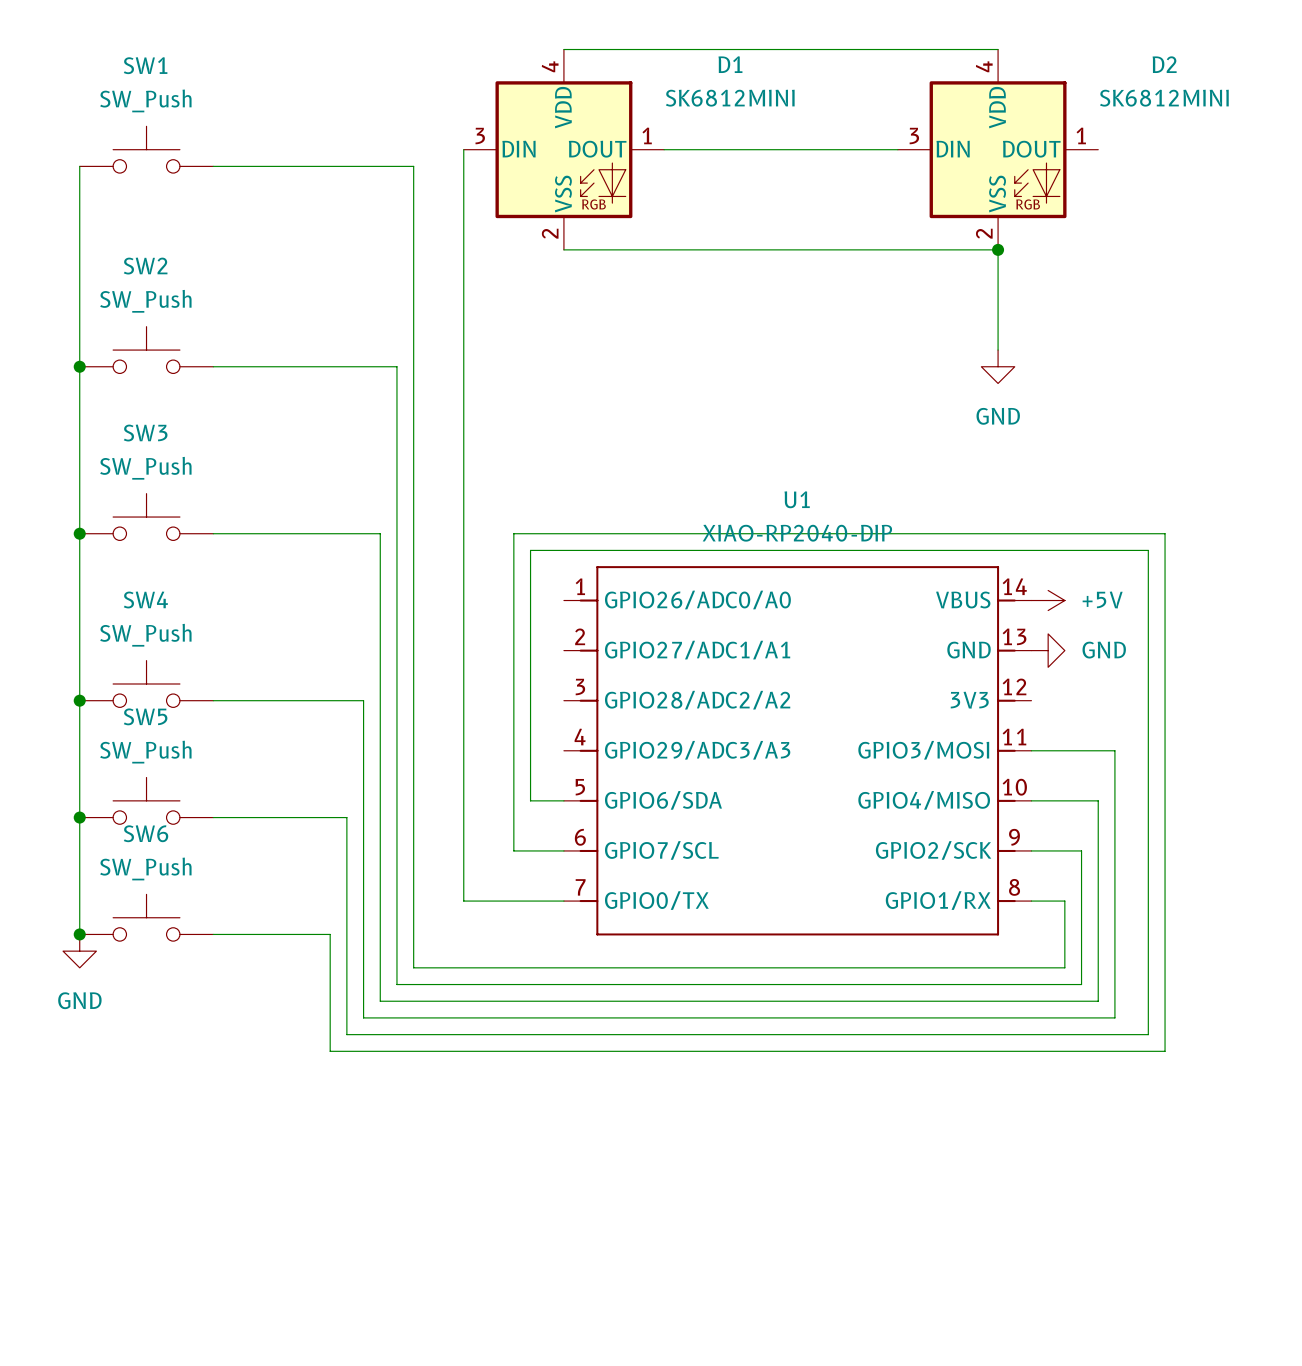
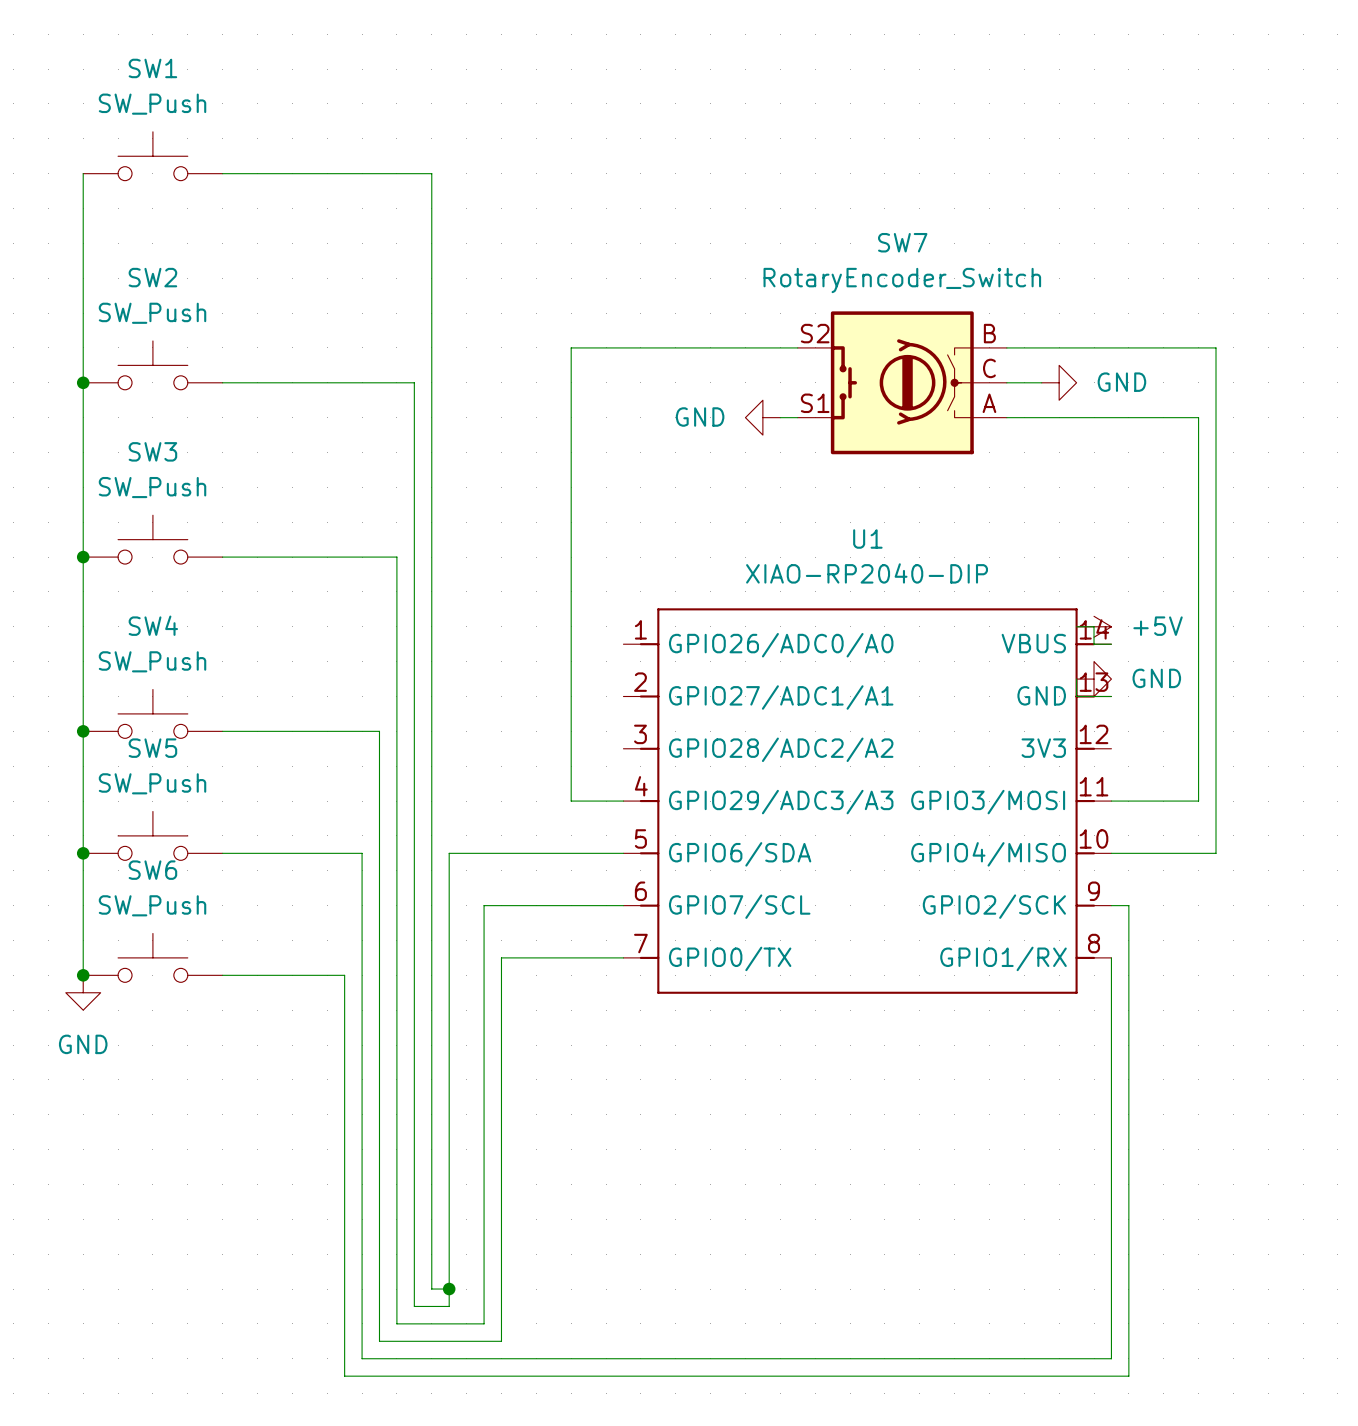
wire: (563, 49) (998, 49) -> none
wire: (463, 149) (463, 867) -> (623, 905) (484, 905)
D1: SK6812MINI (563, 149) -> none
wire: (664, 149) (897, 149) -> none
D2: SK6812MINI (998, 149) -> none
wire: (563, 249) (998, 249) (998, 350) -> none
junction: (998, 249) -> none
wire: none -> (797, 347) (571, 347) (571, 801) (623, 801)
SW7: none -> RotaryEncoder_Switch (902, 382)
wire: none -> (1006, 382) (1041, 382)
power symbol rotation: 0° (998, 366) -> 90° counterclockwise (1059, 382)
power symbol: none -> GND (762, 417)
wire: none -> (780, 417) (797, 417)
wire: (1165, 533) (513, 533) (513, 850) (563, 850) -> (1216, 557) (1216, 347) (1006, 347)
wire: (1148, 550) (530, 550) (530, 800) (563, 800) -> (1198, 574) (1198, 417) (1006, 417)
wire: none -> (1076, 626) (1094, 626) (1094, 644) (1111, 644)
wire: none -> (1076, 679) (1076, 696) (1111, 696)
U1 position: (797, 750) -> (867, 801)
wire: (1031, 750) (1114, 750) (1114, 1017) (363, 1017) -> (623, 957) (501, 957) (501, 1341) (379, 1341) (379, 1062)
wire: (1148, 767) (1148, 1034) (346, 1034) -> (1198, 801) (1111, 801)
wire: (1031, 800) (1098, 800) (1098, 1001) (380, 1001) -> none
wire: none -> (623, 853) (449, 853) (449, 1306) (414, 1306) (414, 1027)
wire: (1165, 817) (1165, 1051) (330, 1051) -> (1216, 853) (1111, 853)
wire: (1031, 850) (1081, 850) (1081, 867) -> (1111, 905) (1128, 905)
wire: (463, 901) (563, 901) -> (484, 940) (484, 1323) (396, 1323) (396, 1045)
wire: (1031, 901) (1064, 901) (1064, 917) -> none
wire: (413, 967) (1064, 967) -> (362, 1079) (362, 1358) (1111, 1358) (1111, 1010)
wire: none -> (431, 1010) (431, 1289) (449, 1289)
wire: (396, 984) (1081, 984) -> (344, 1097) (344, 1376) (1128, 1376) (1128, 1027)
junction: none -> (449, 1289)

